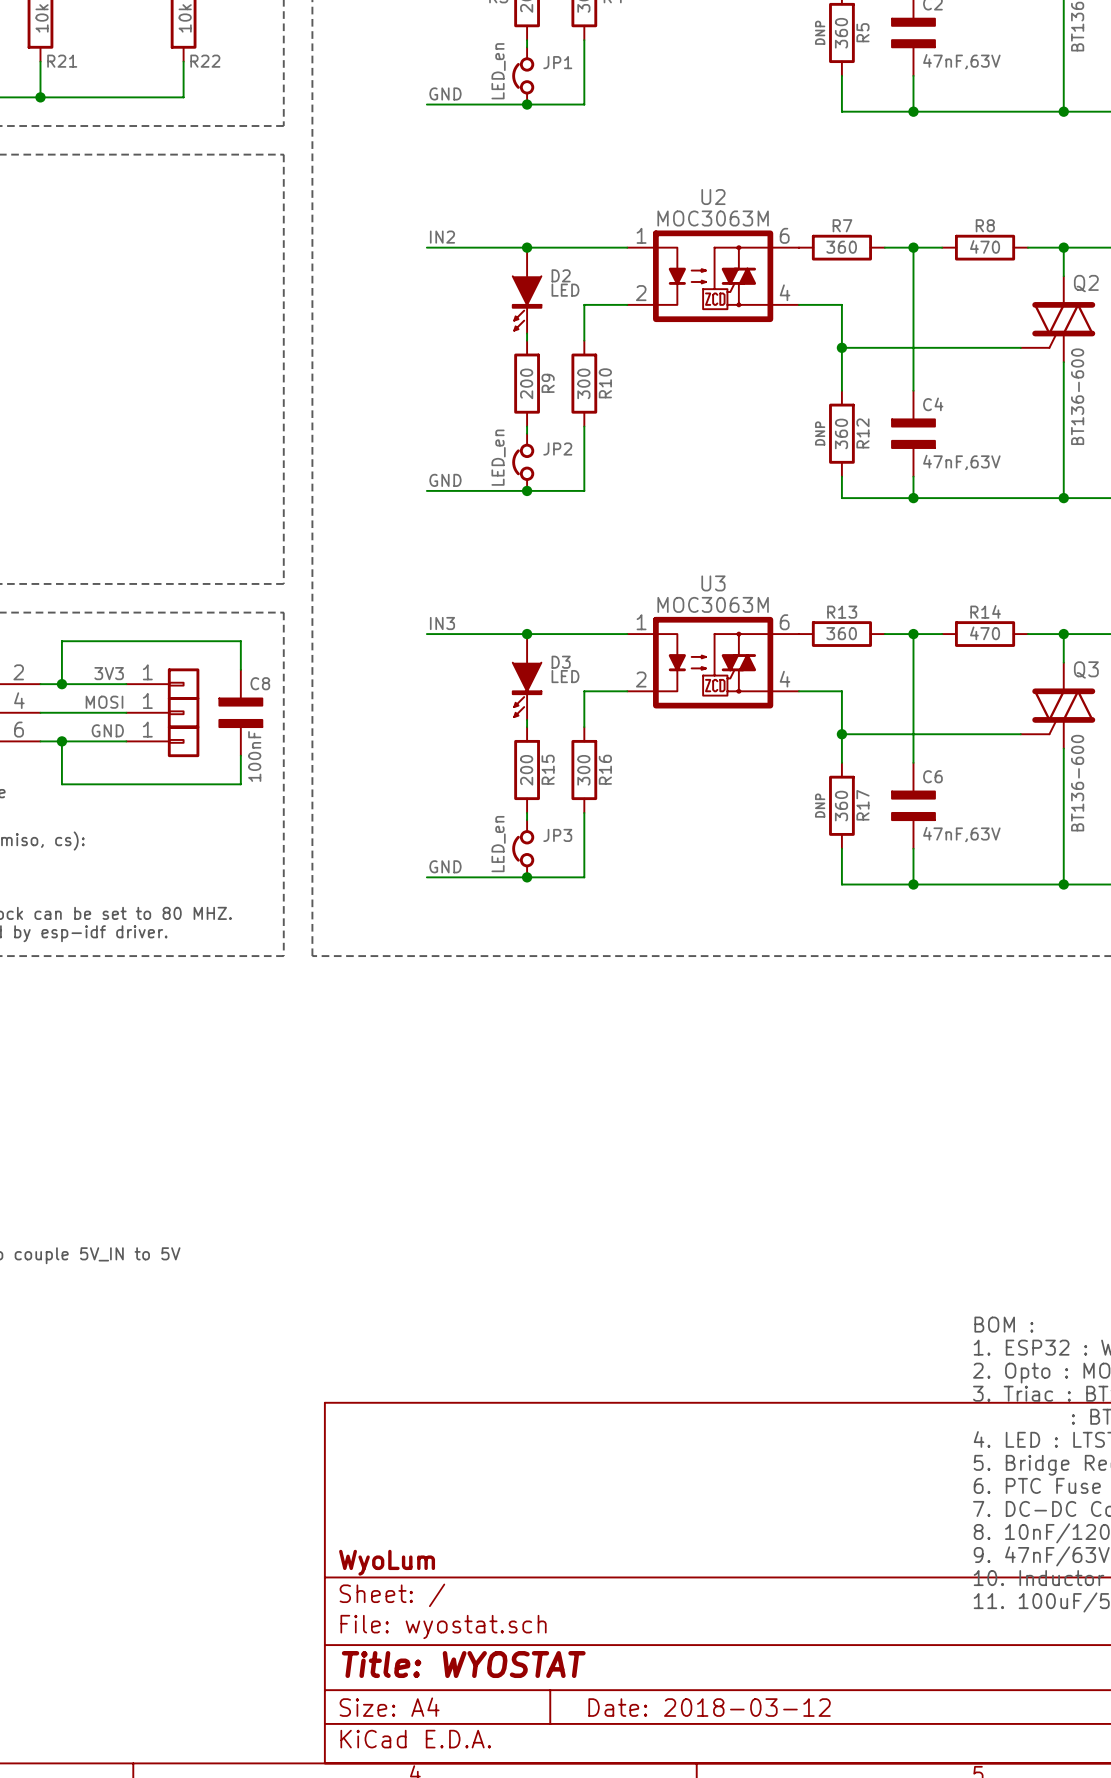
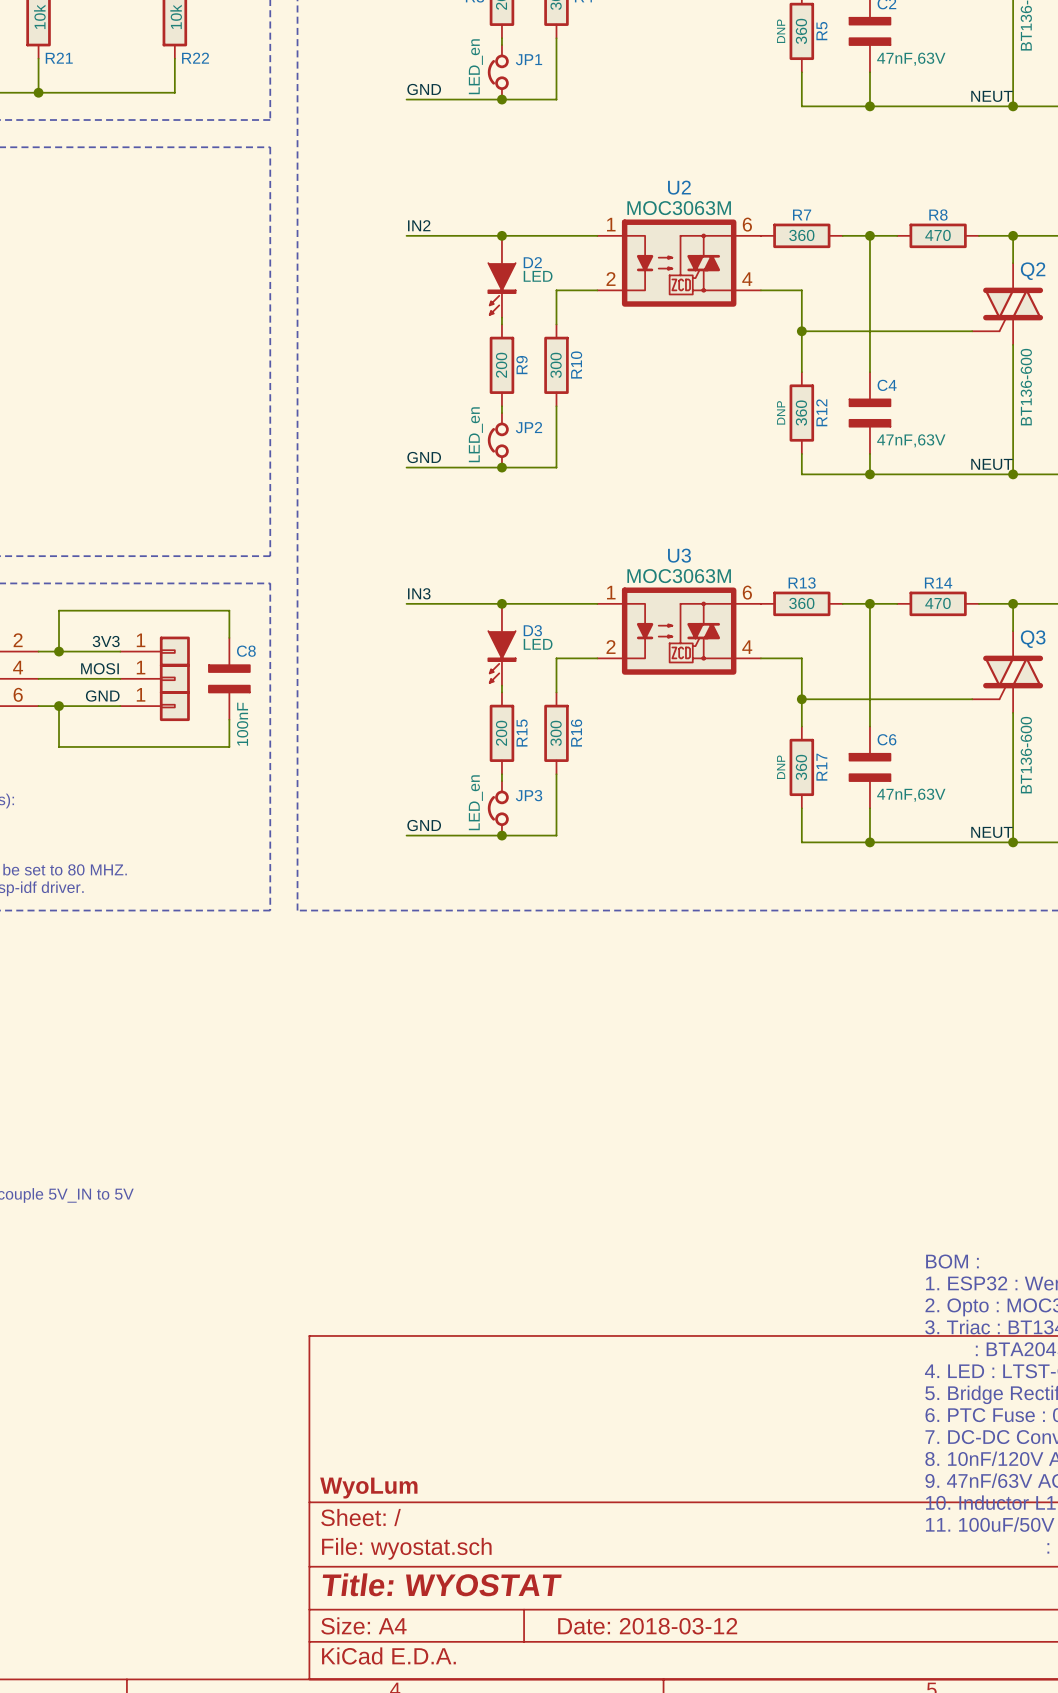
label: none -> NEUT (991, 96)
label: none -> NEUT (991, 464)
label: none -> NEUT (991, 832)

